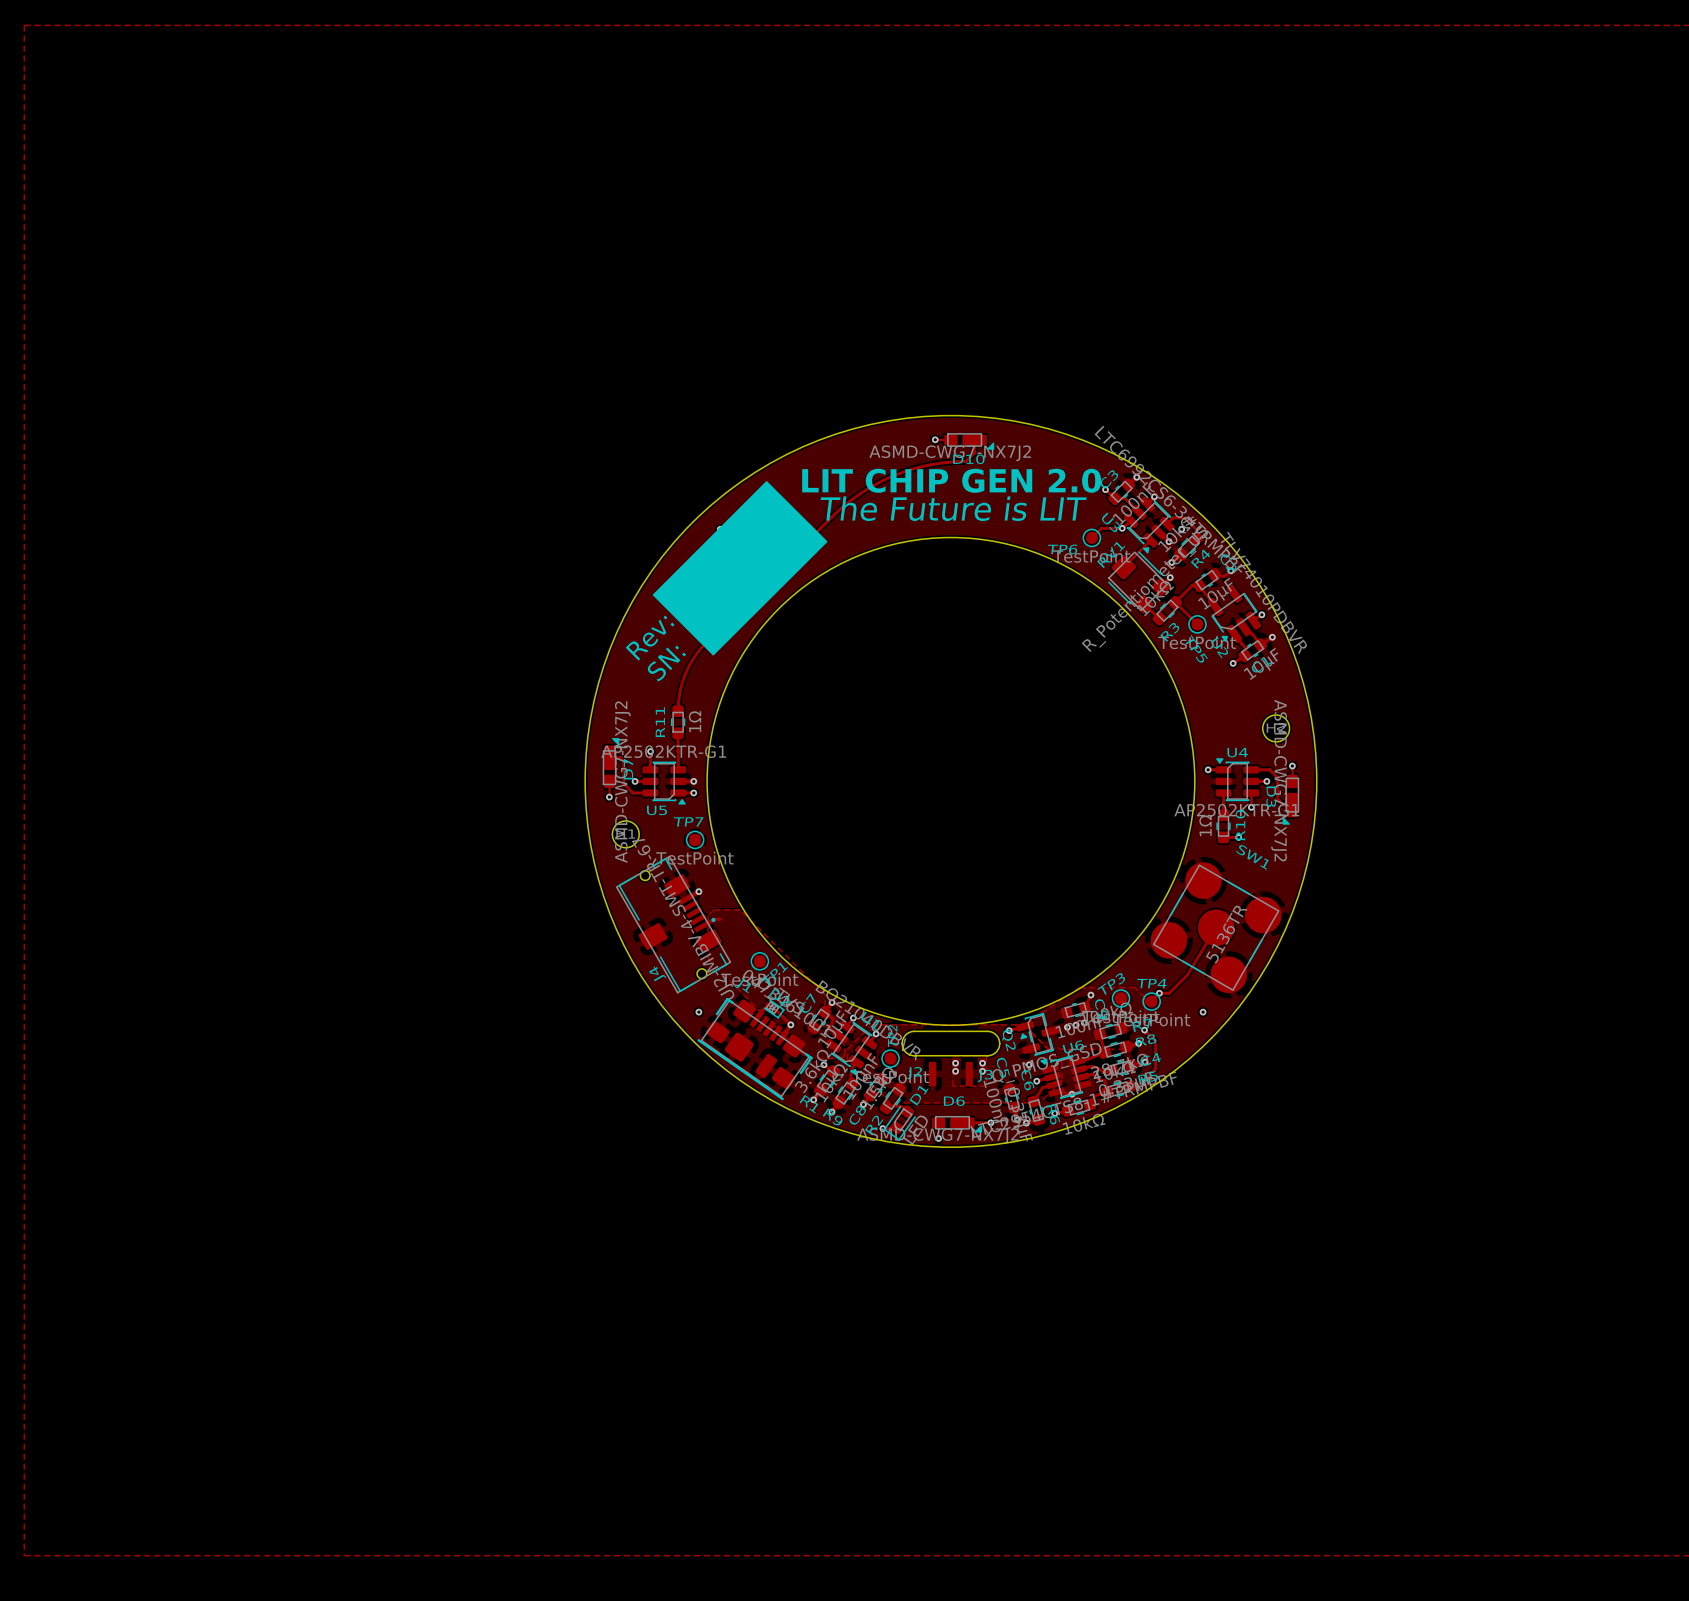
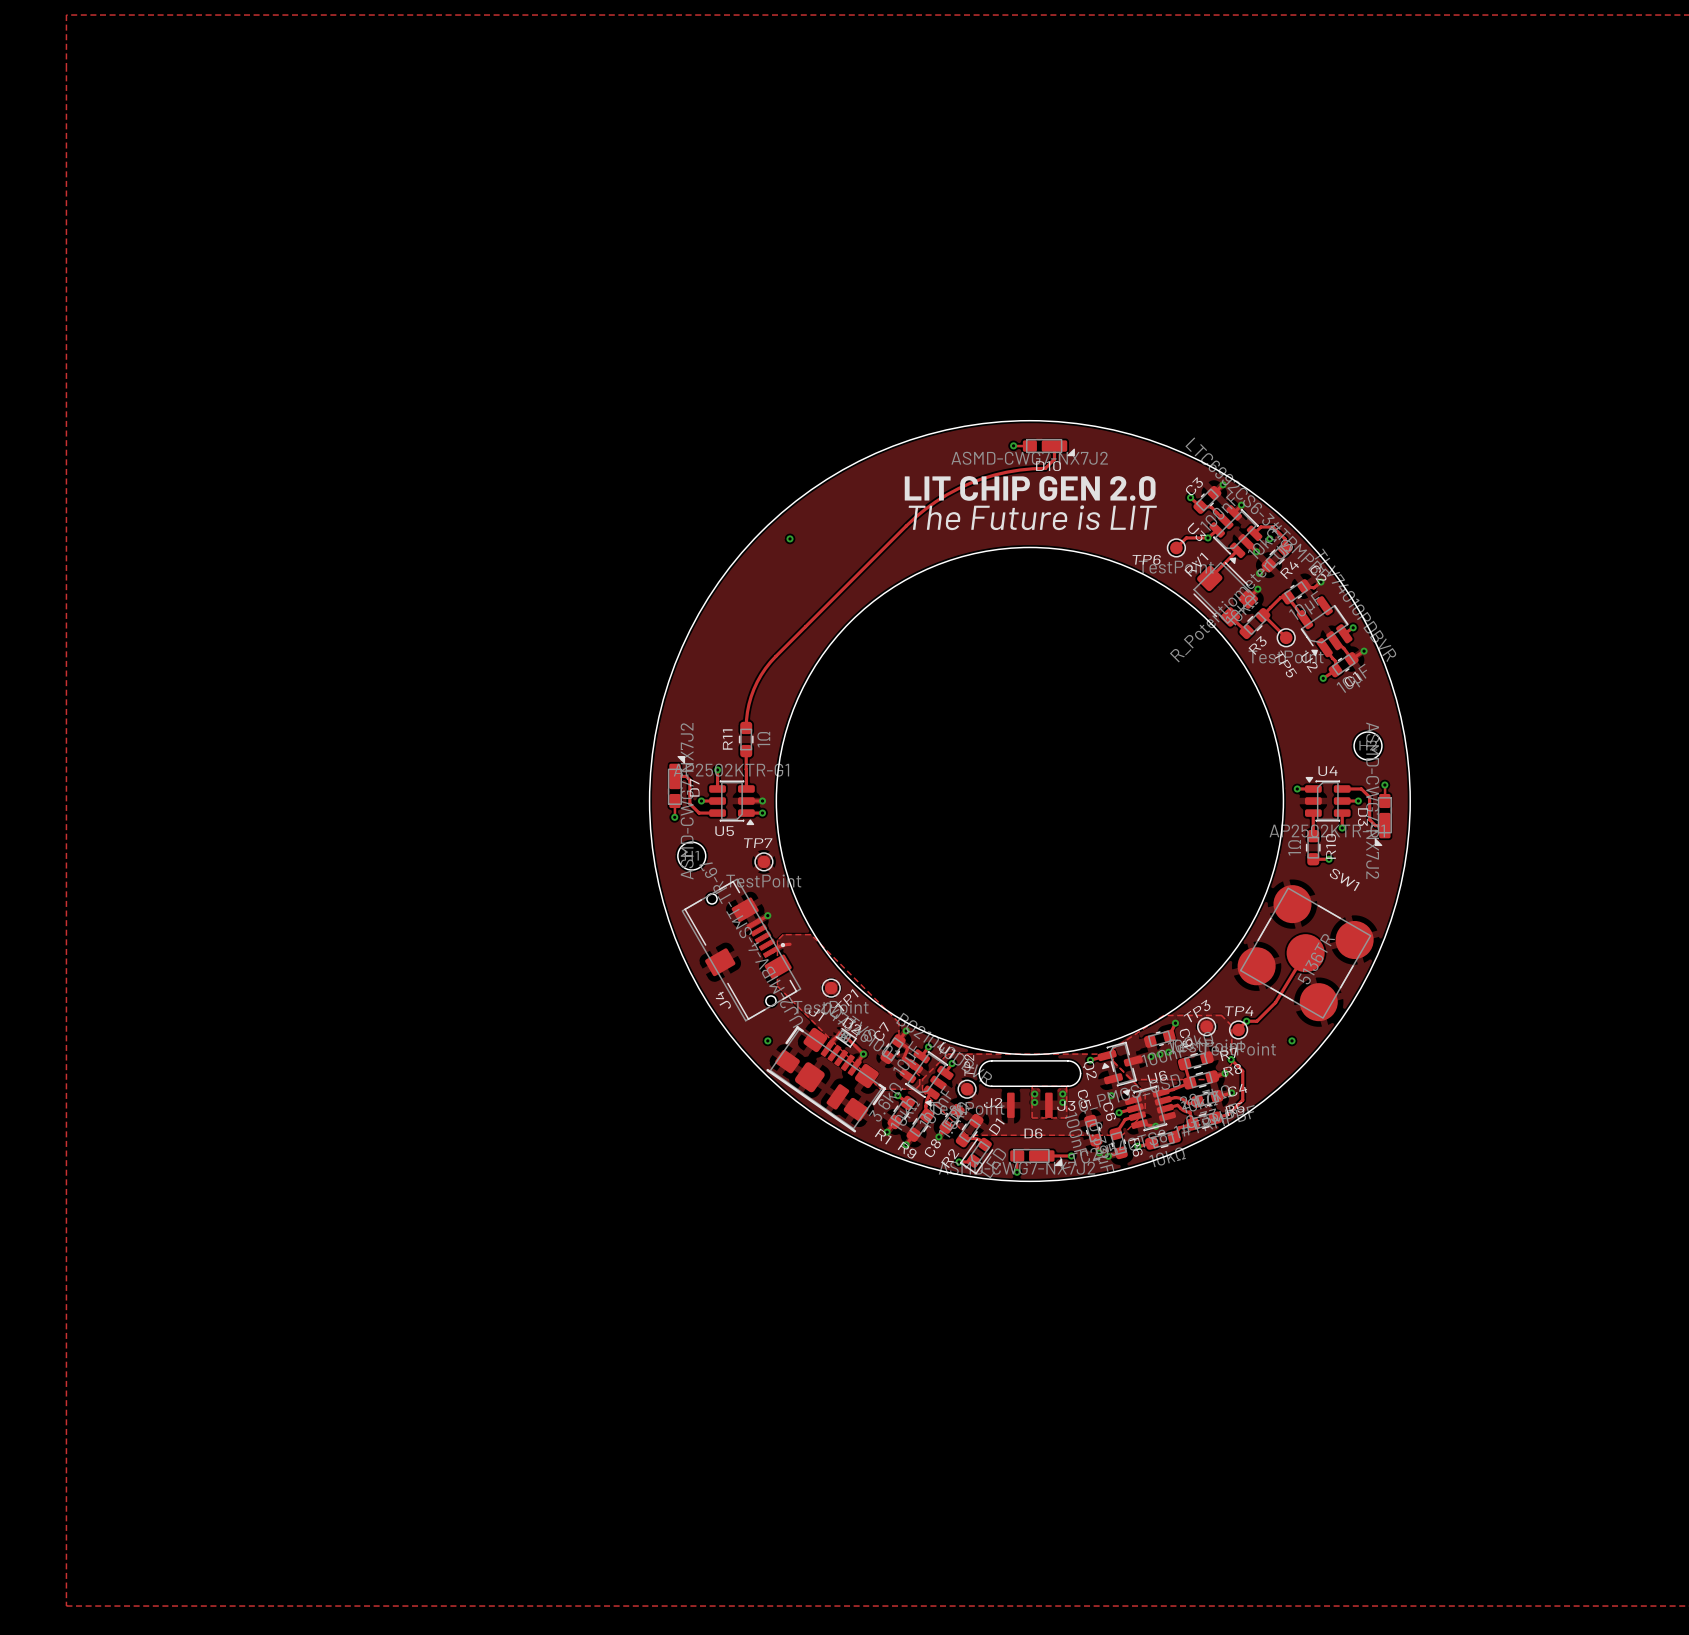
drawing: [652, 481, 828, 656] -> none
text: Rev: (650, 638) -> none
text: SN: (666, 663) -> none

